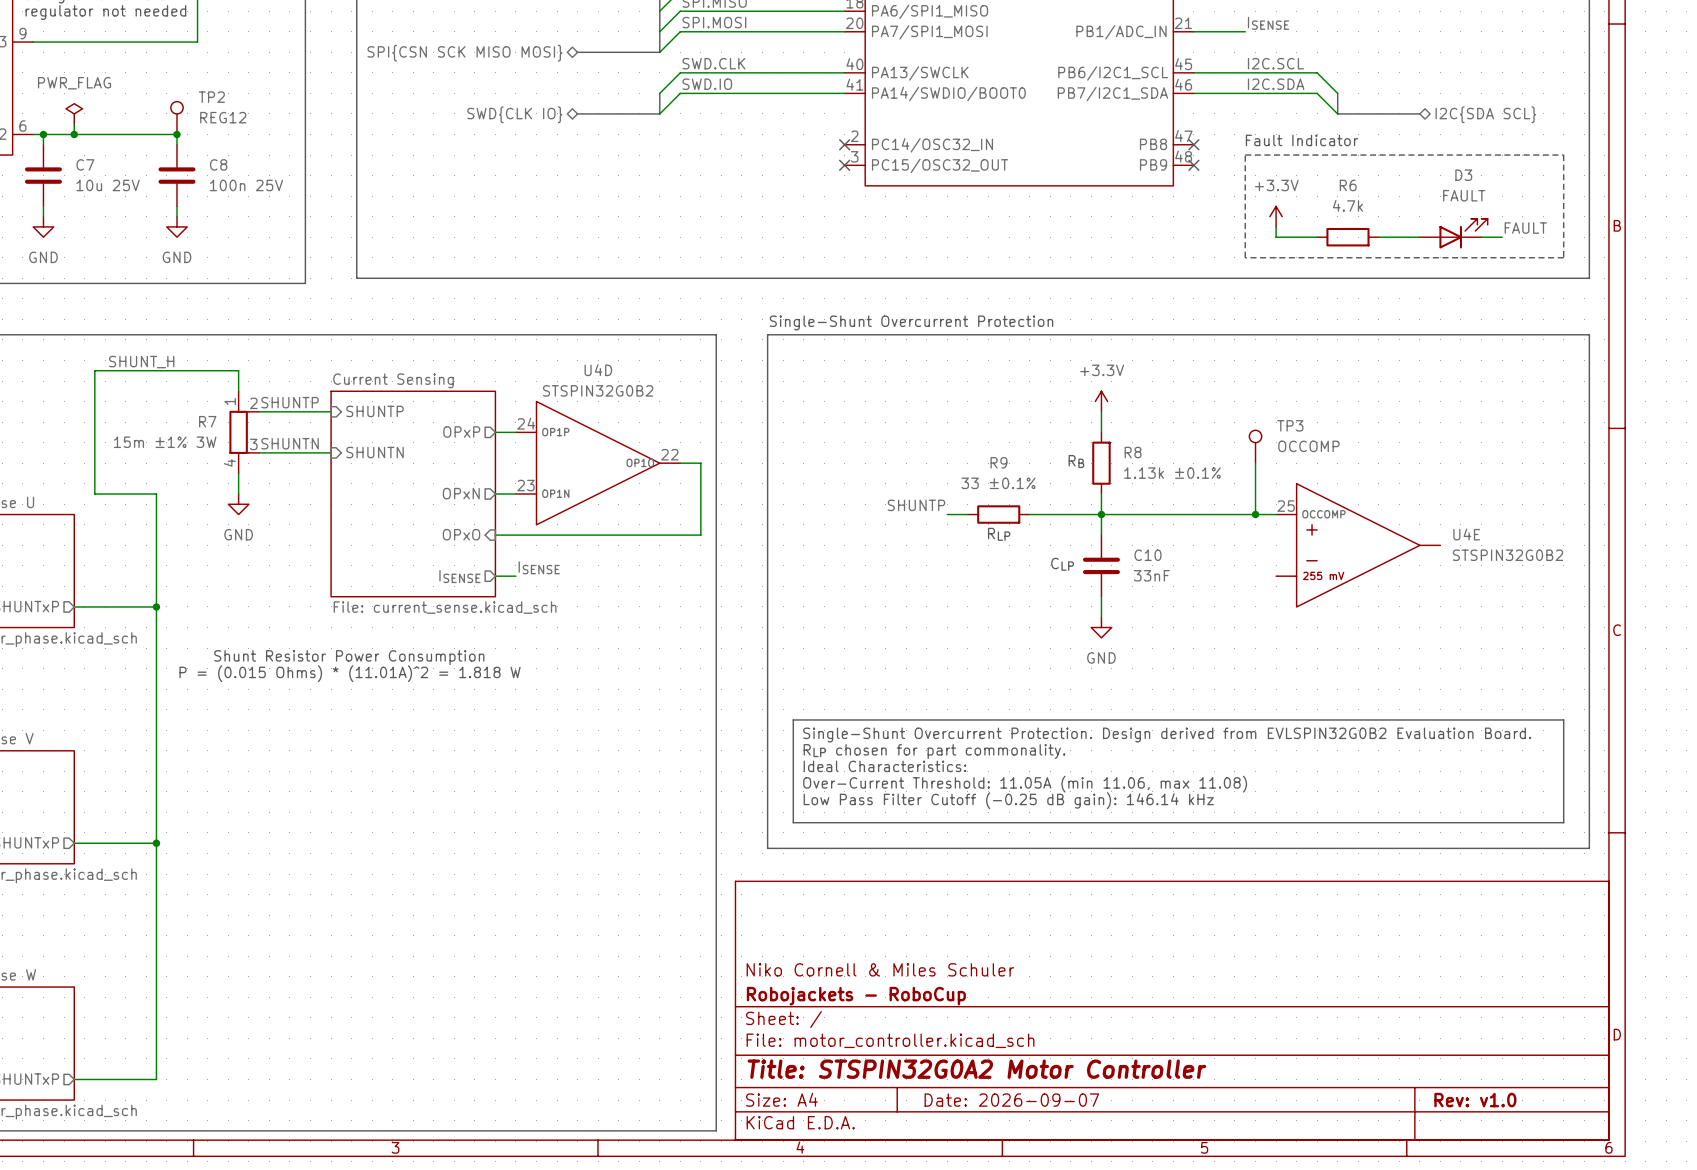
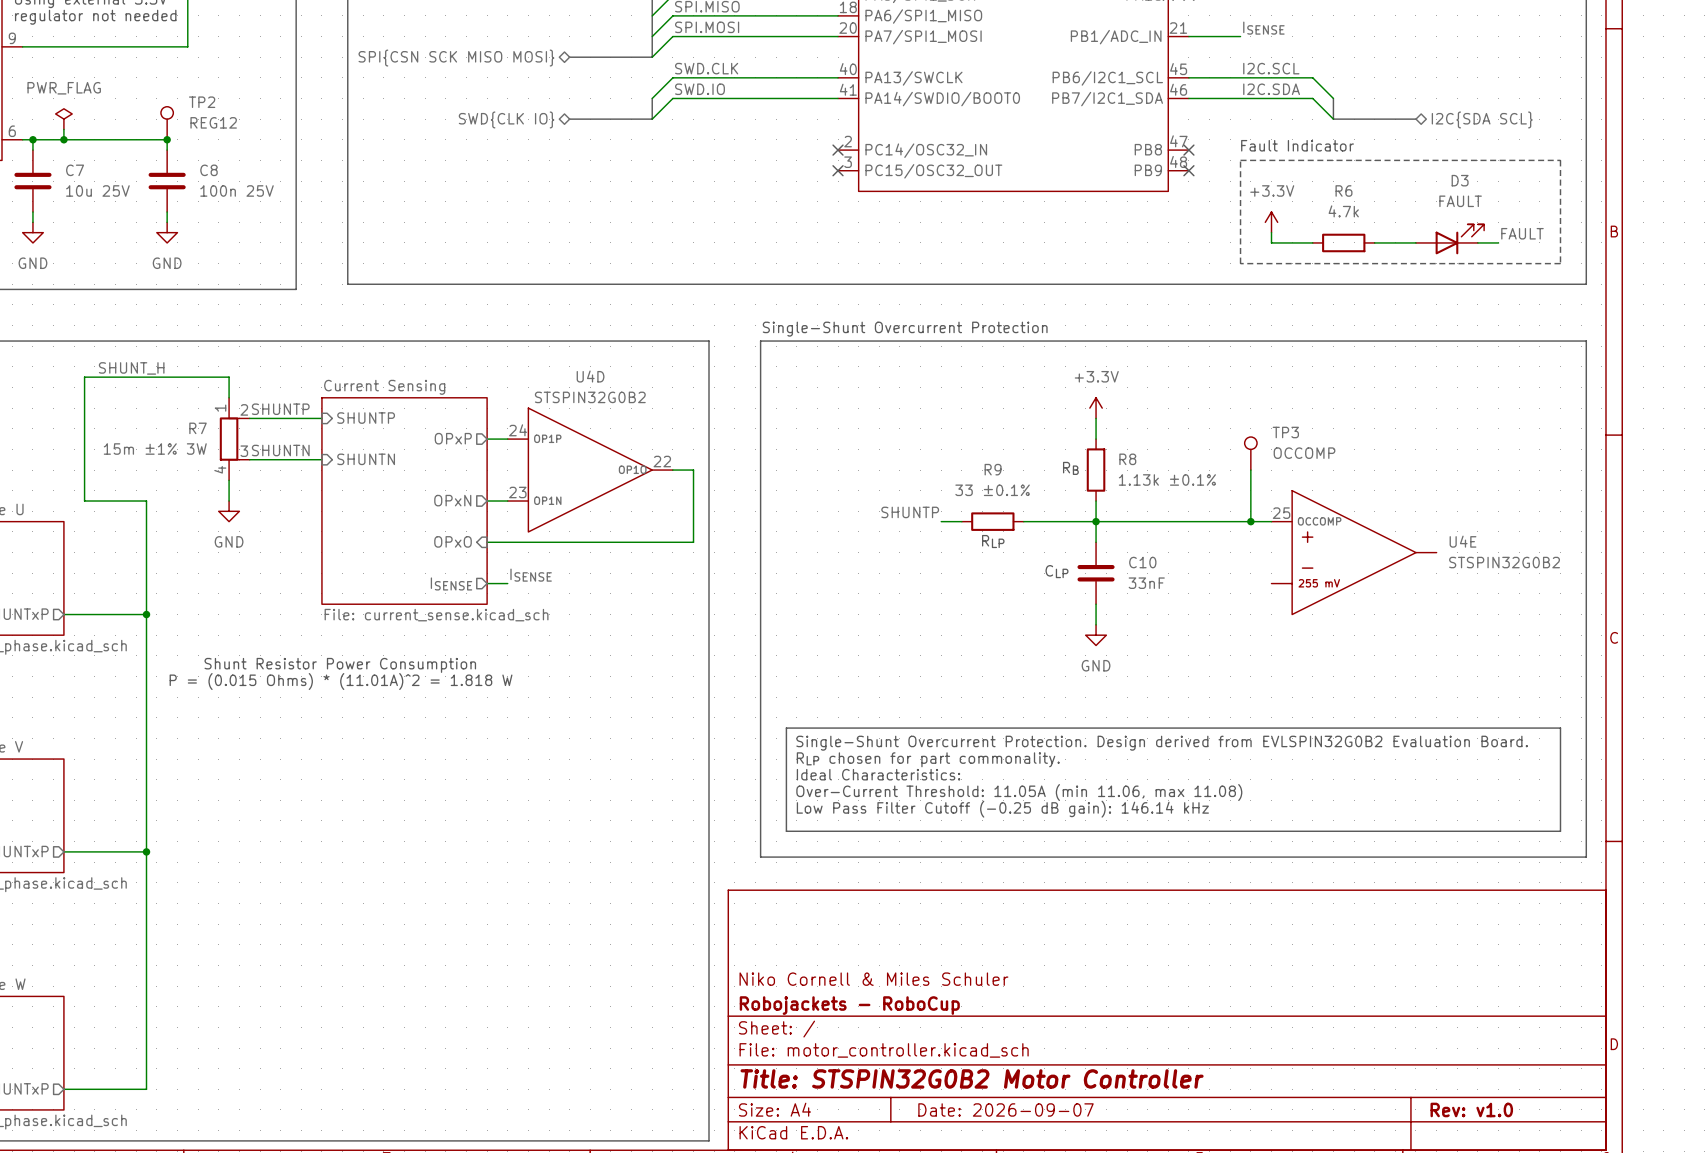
title block: Title: STSPIN32G0A2 Motor Controller (976, 1069) -> Title: STSPIN32G0B2 Motor Controller (972, 1078)

